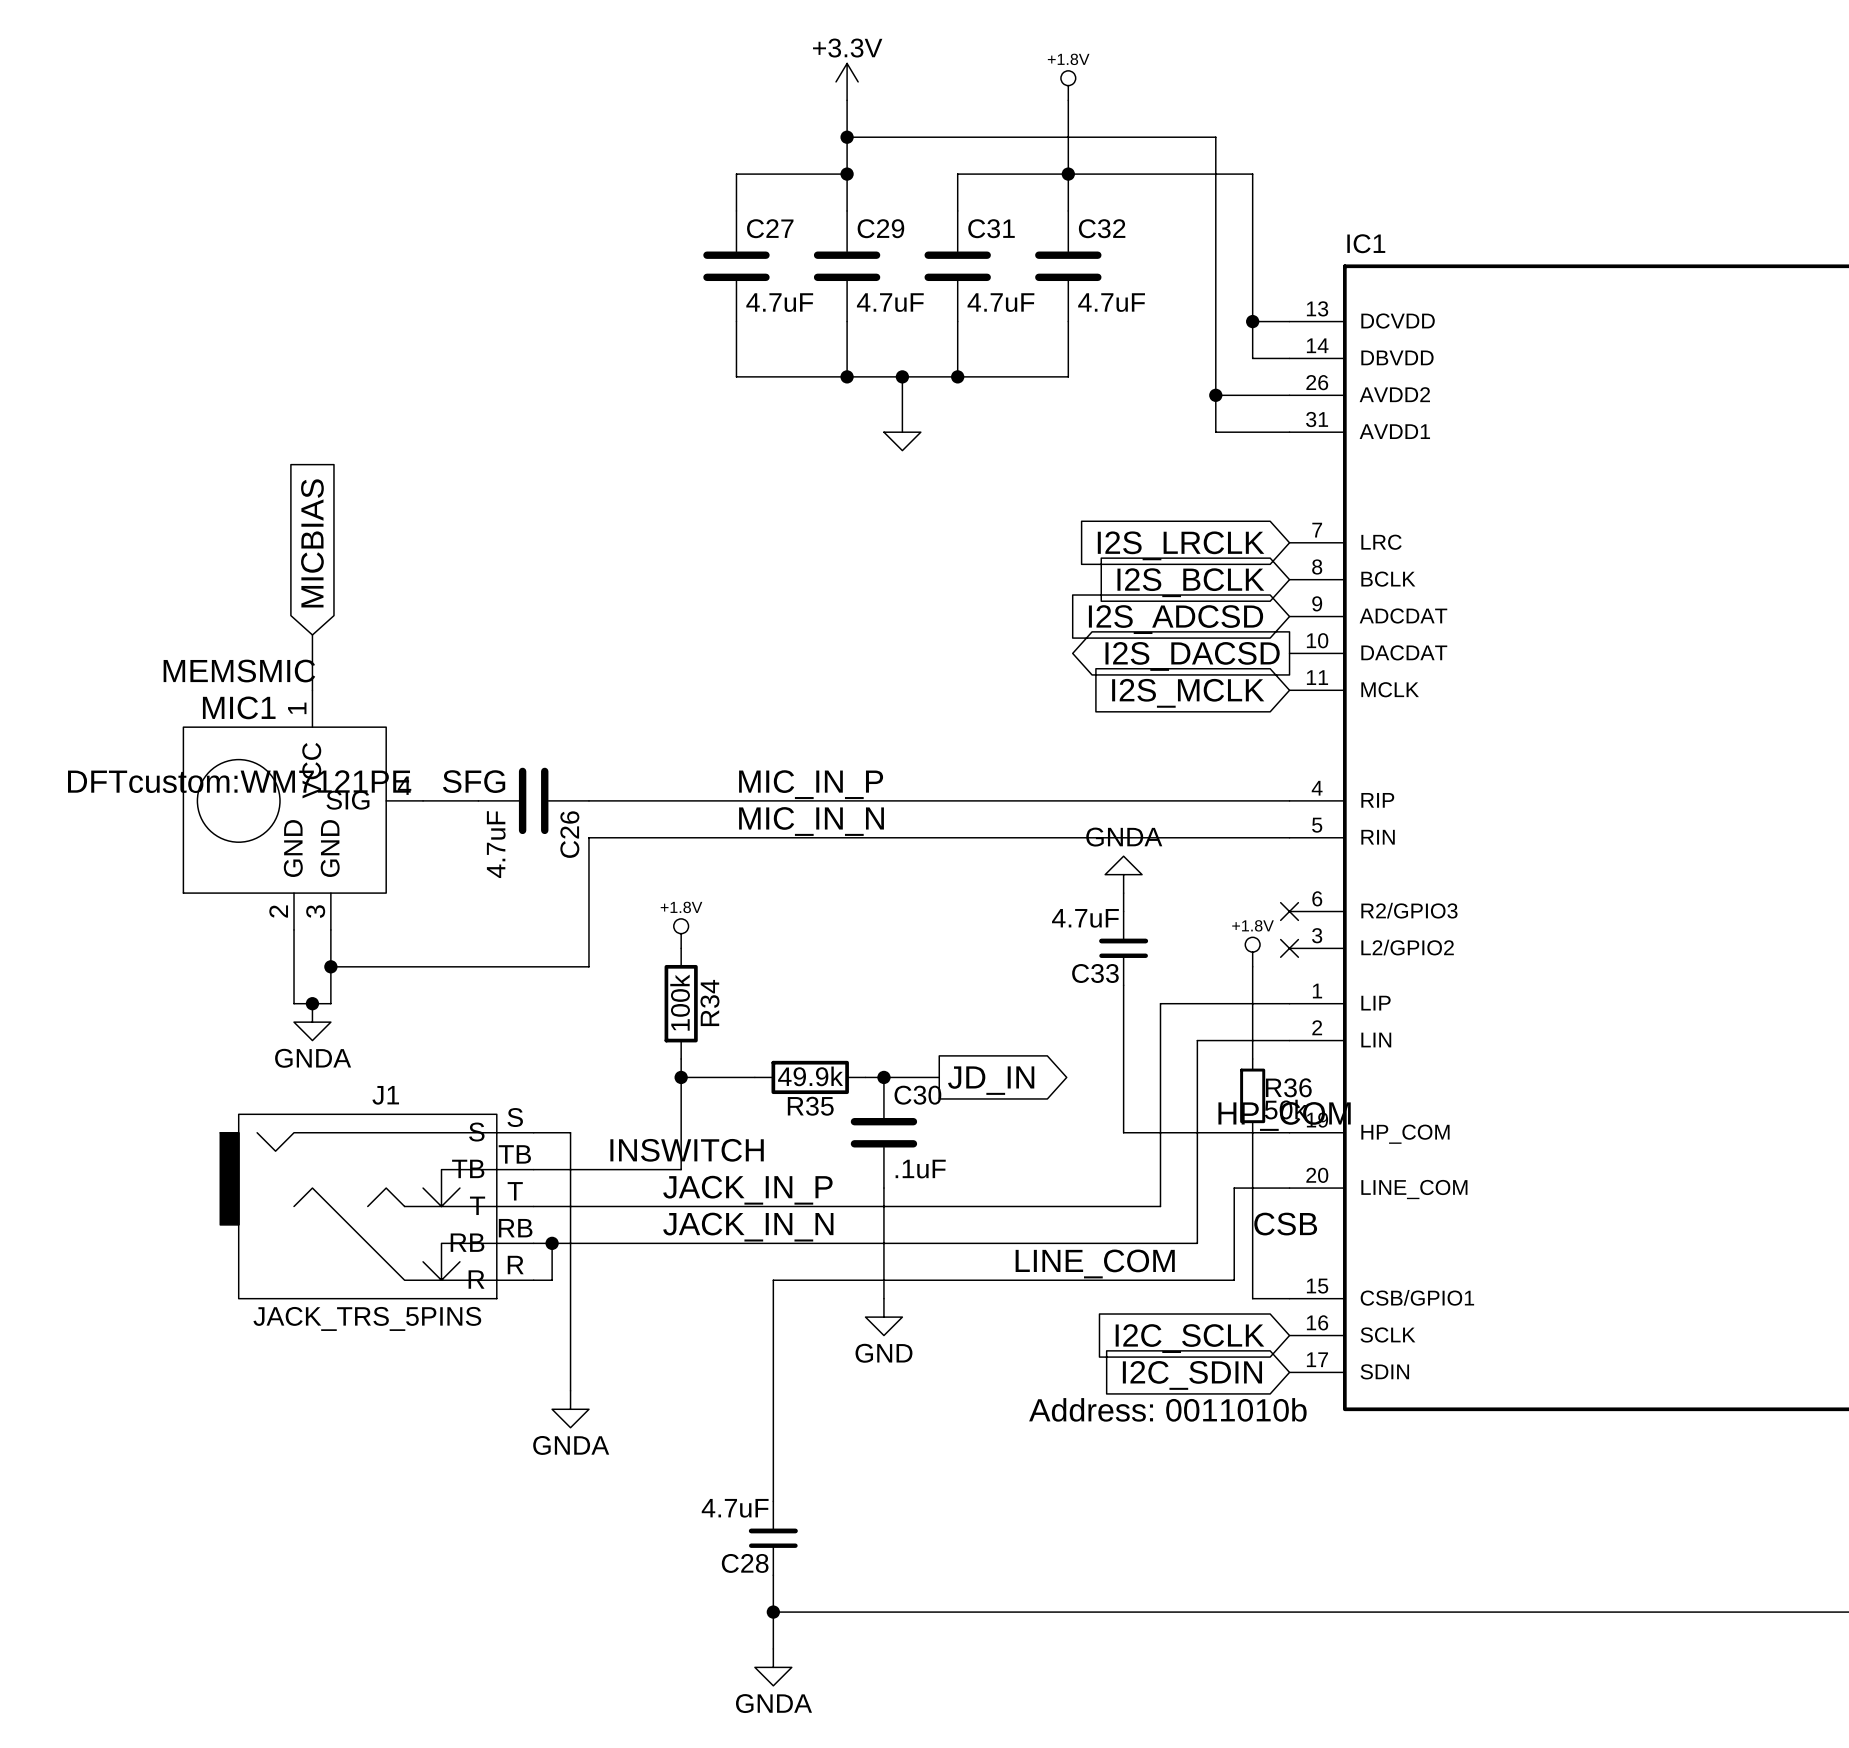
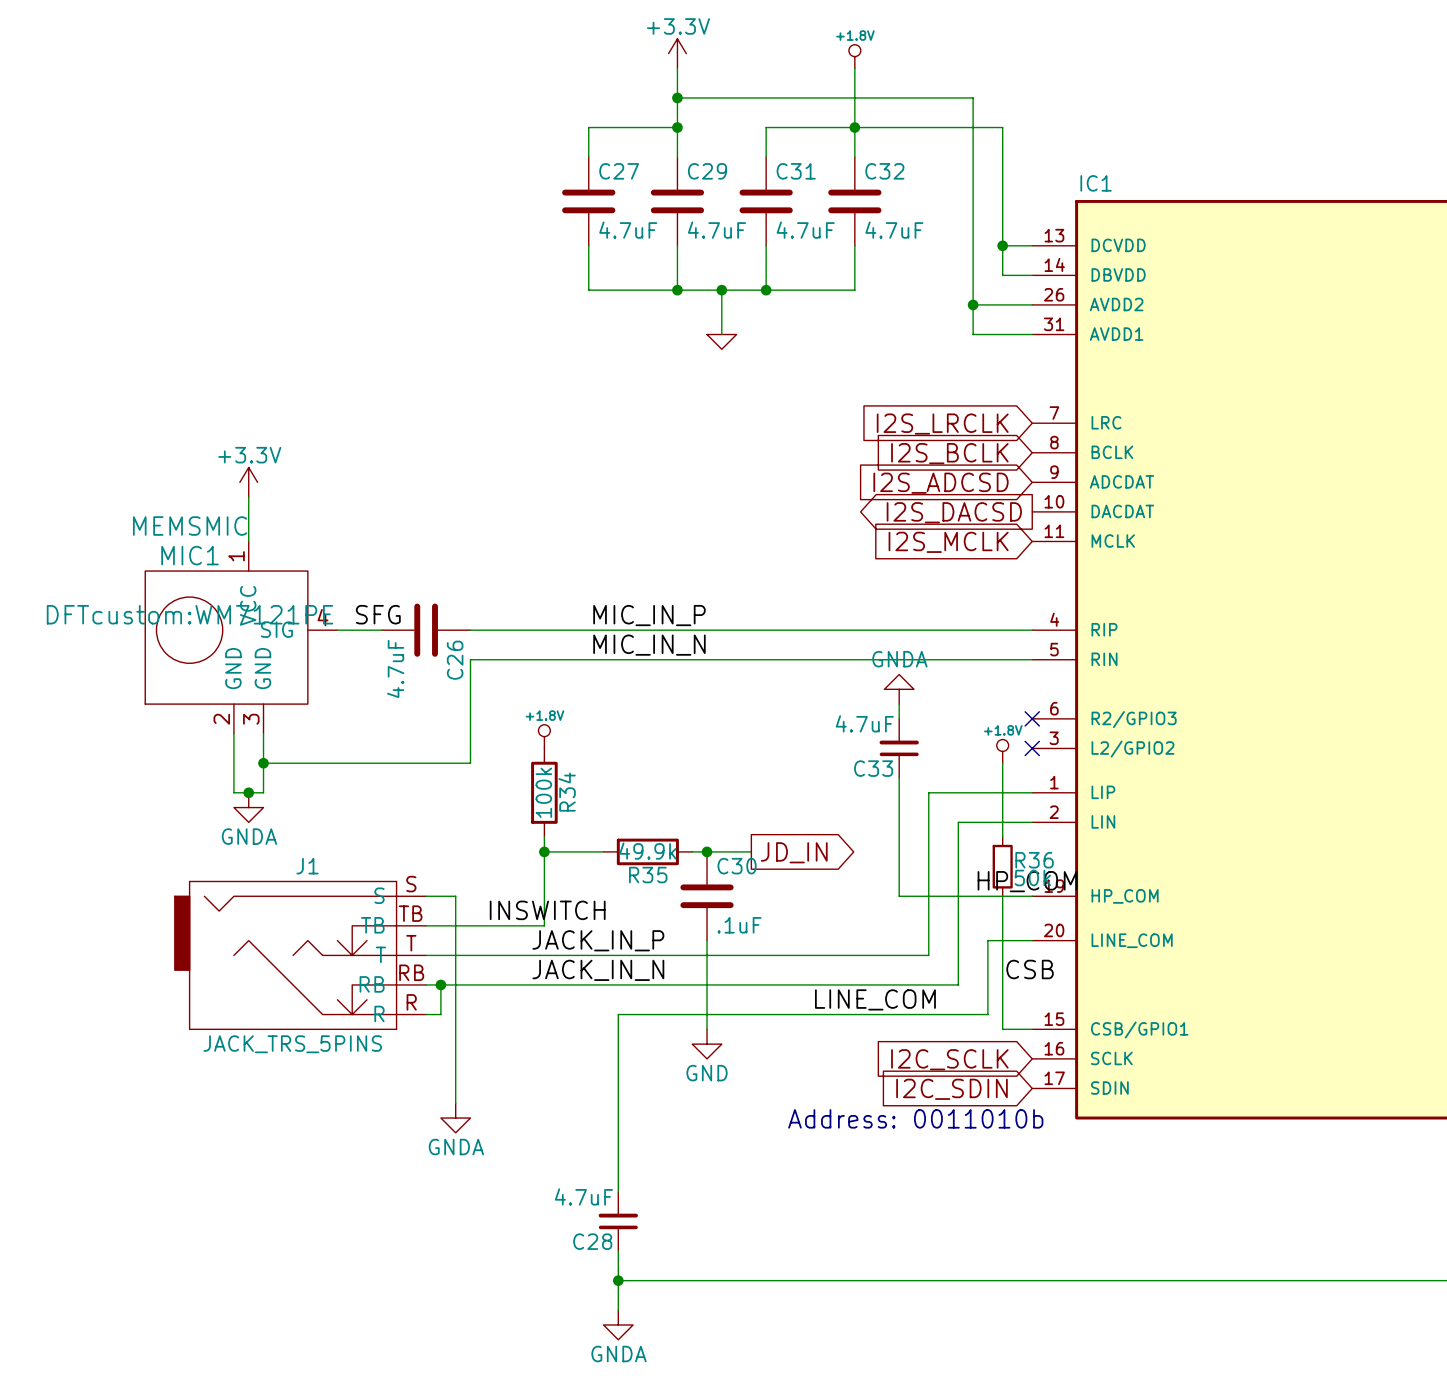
global label: MICBIAS (312, 543) -> none
power symbol: none -> +3.3V (248, 482)

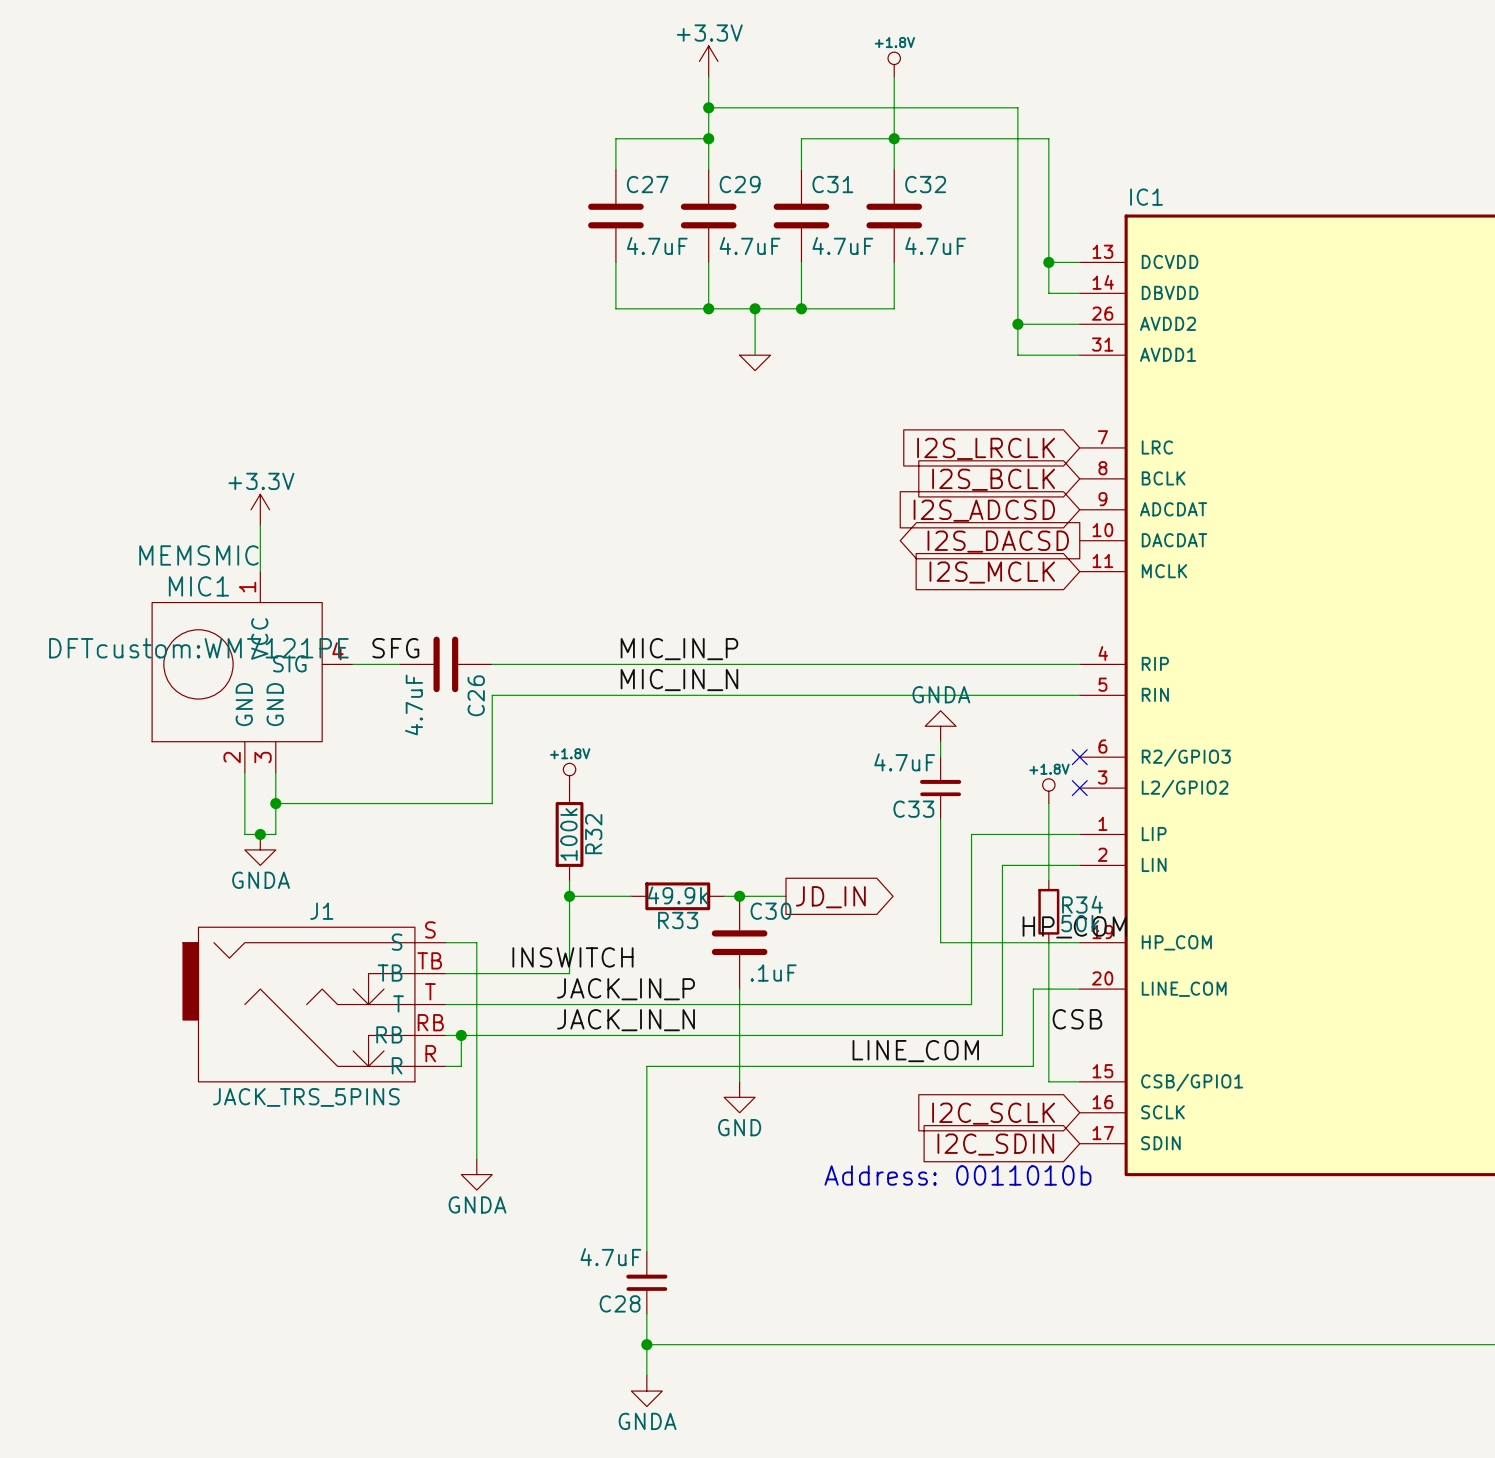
R34 name: R34 (567, 792) -> R32 (593, 834)
R36 name: R36 (1034, 860) -> R34 (1082, 904)
R35 name: R35 (648, 875) -> R33 (678, 920)

